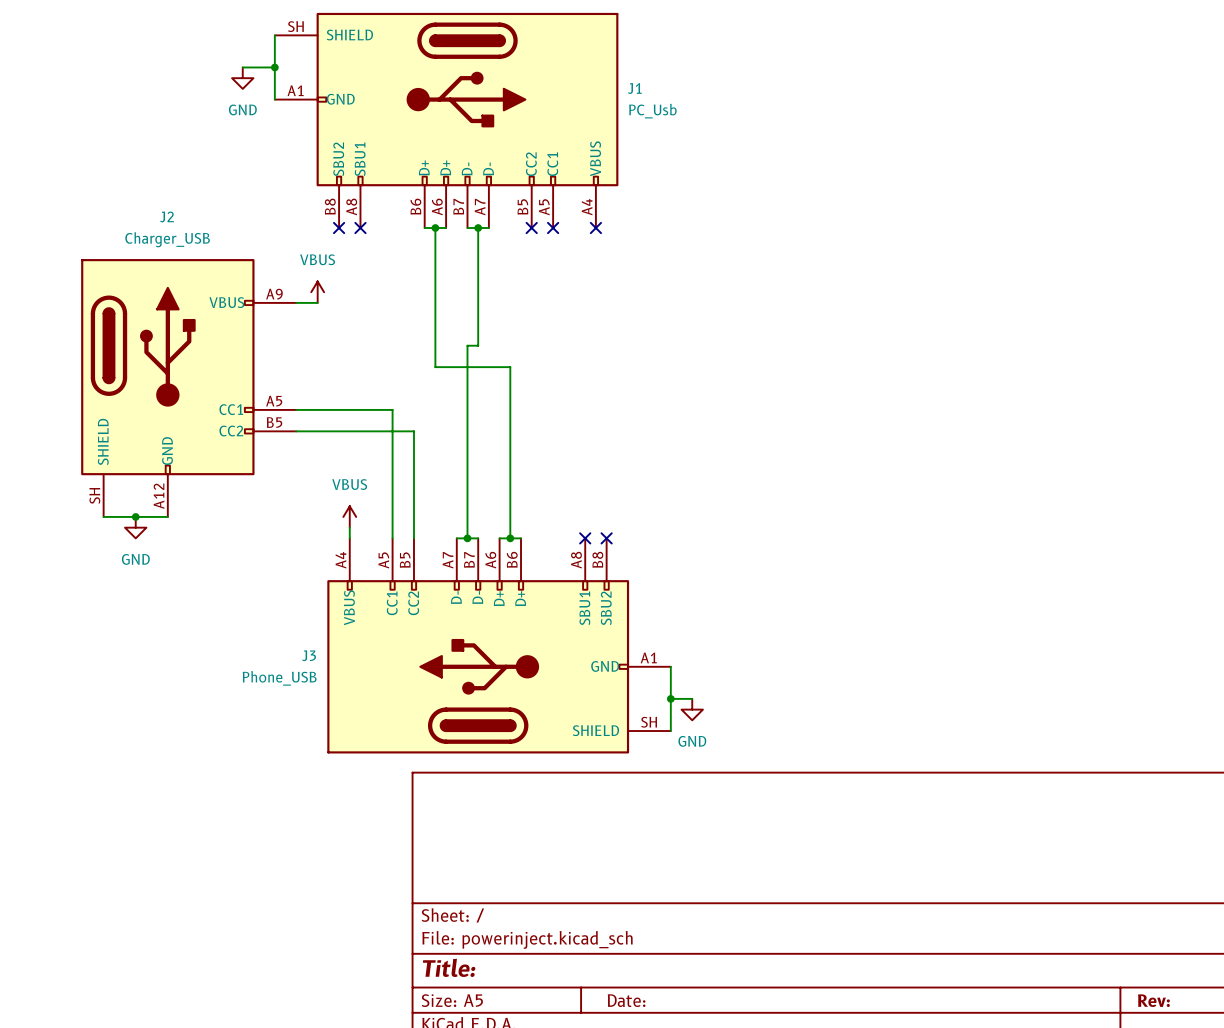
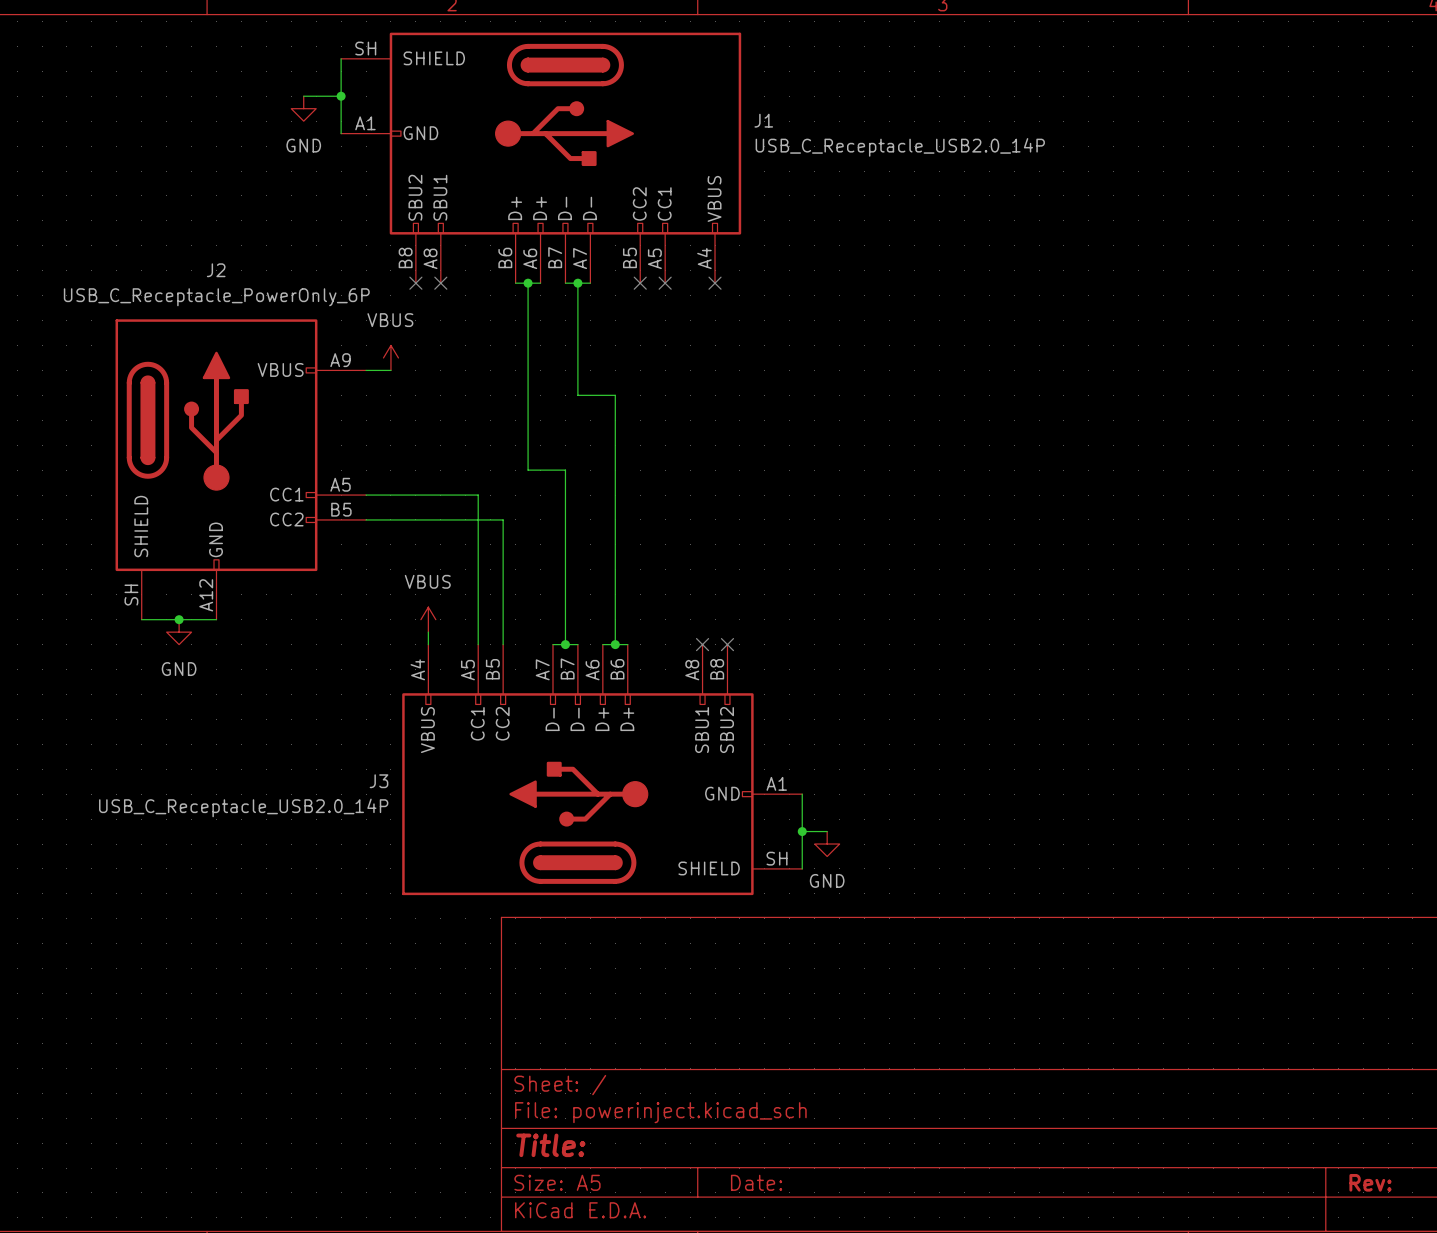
J1 value: PC_Usb (652, 111) -> USB_C_Receptacle_USB2.0_14P (900, 147)
J2 value: Charger_USB (167, 239) -> USB_C_Receptacle_PowerOnly_6P (216, 297)
wire: (478, 324) (478, 345) (467, 345) (467, 388) -> (577, 395) (615, 395) (615, 445)
wire: (435, 367) (510, 367) -> (528, 445) (528, 470) (565, 470)
J3 value: Phone_USB (279, 678) -> USB_C_Receptacle_USB2.0_14P (243, 807)

